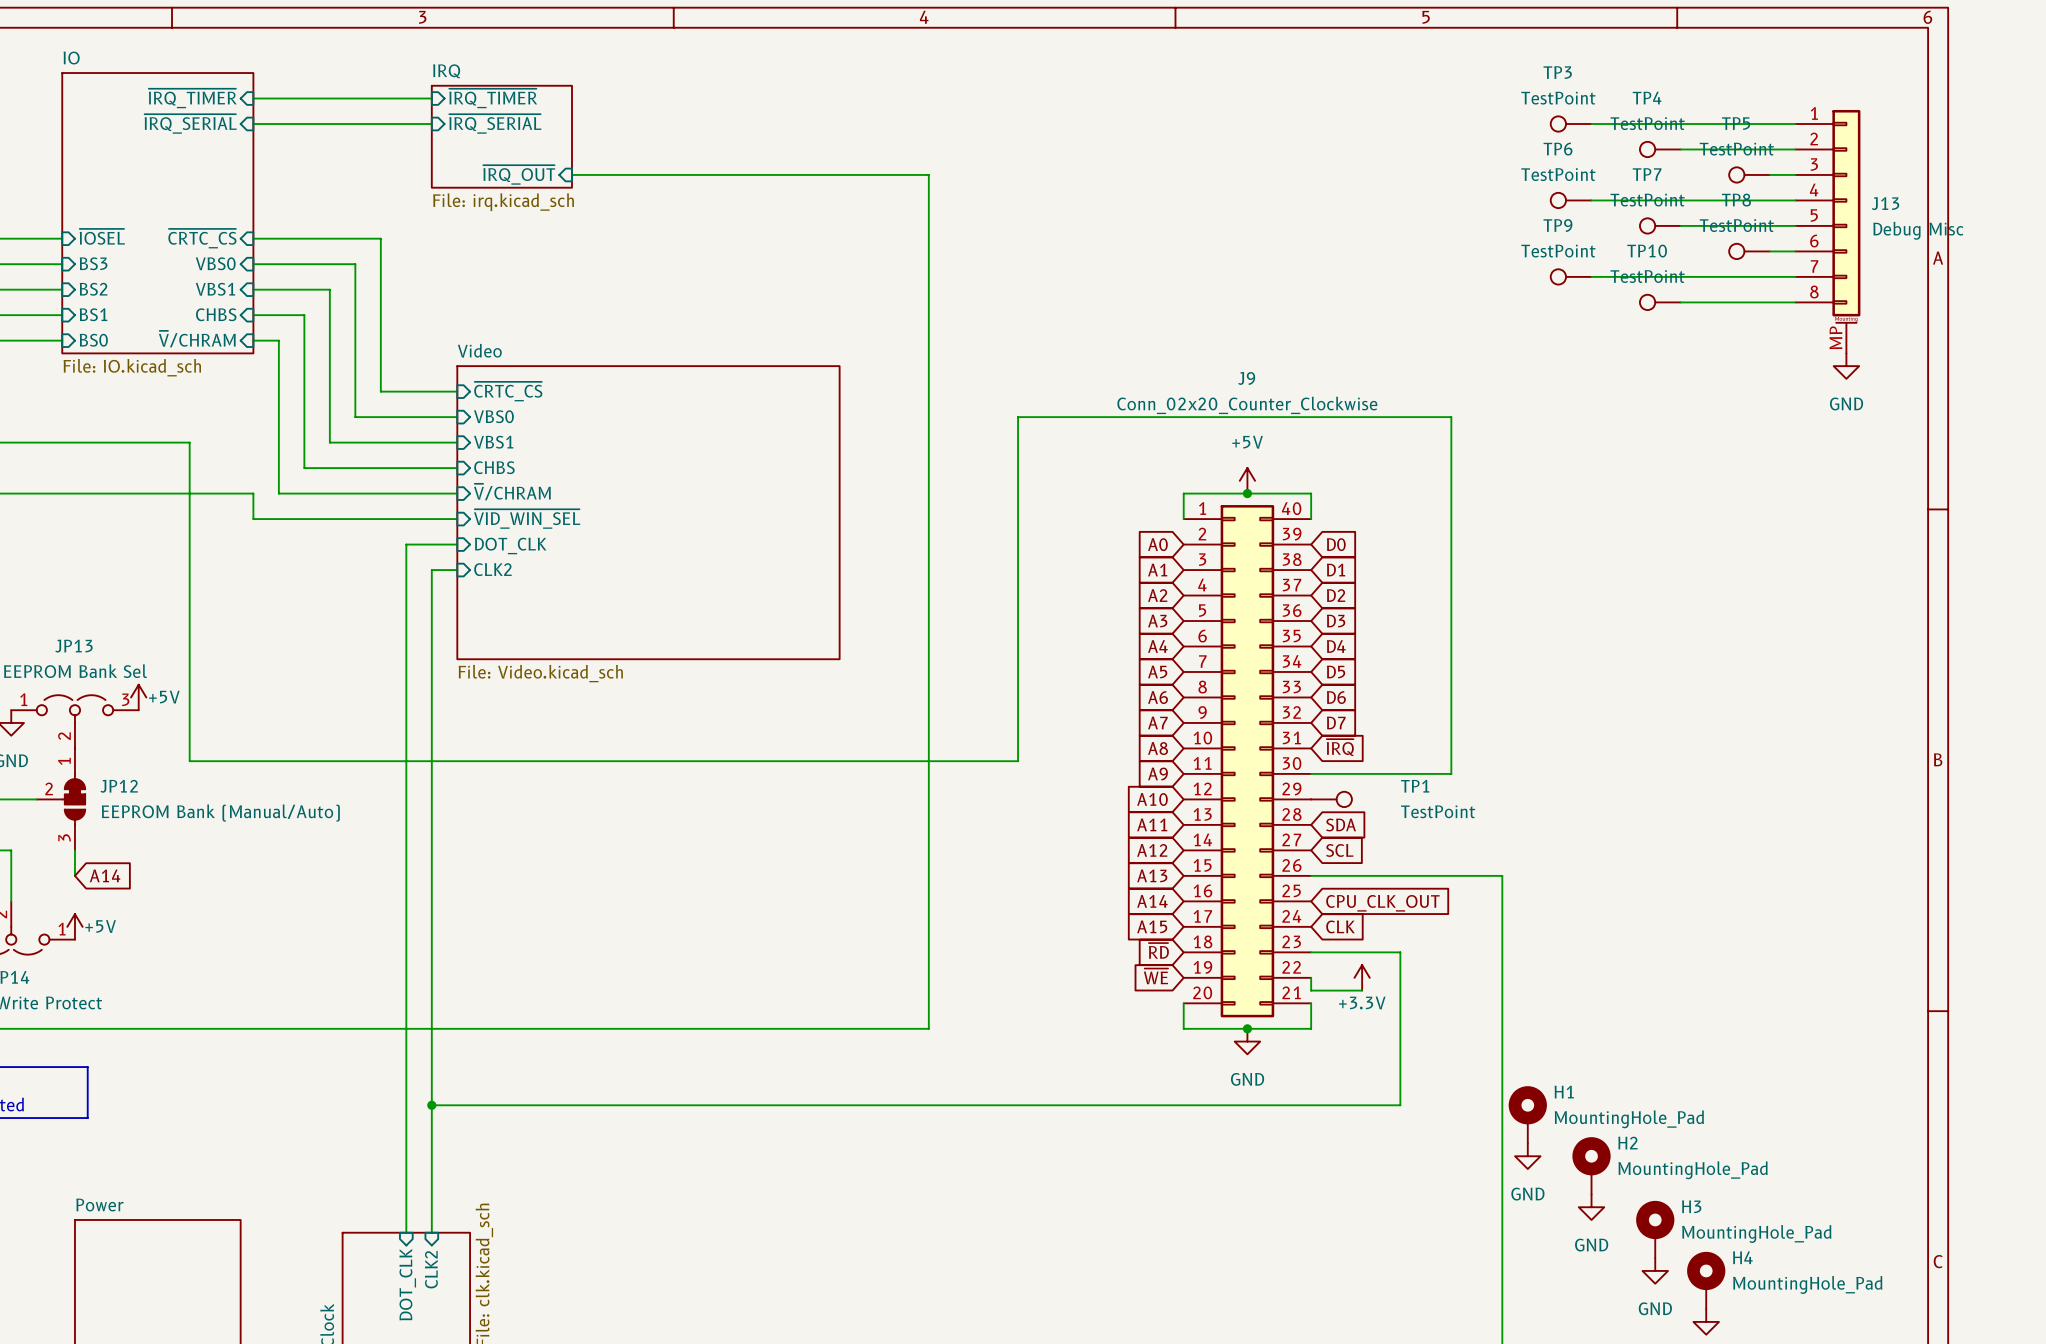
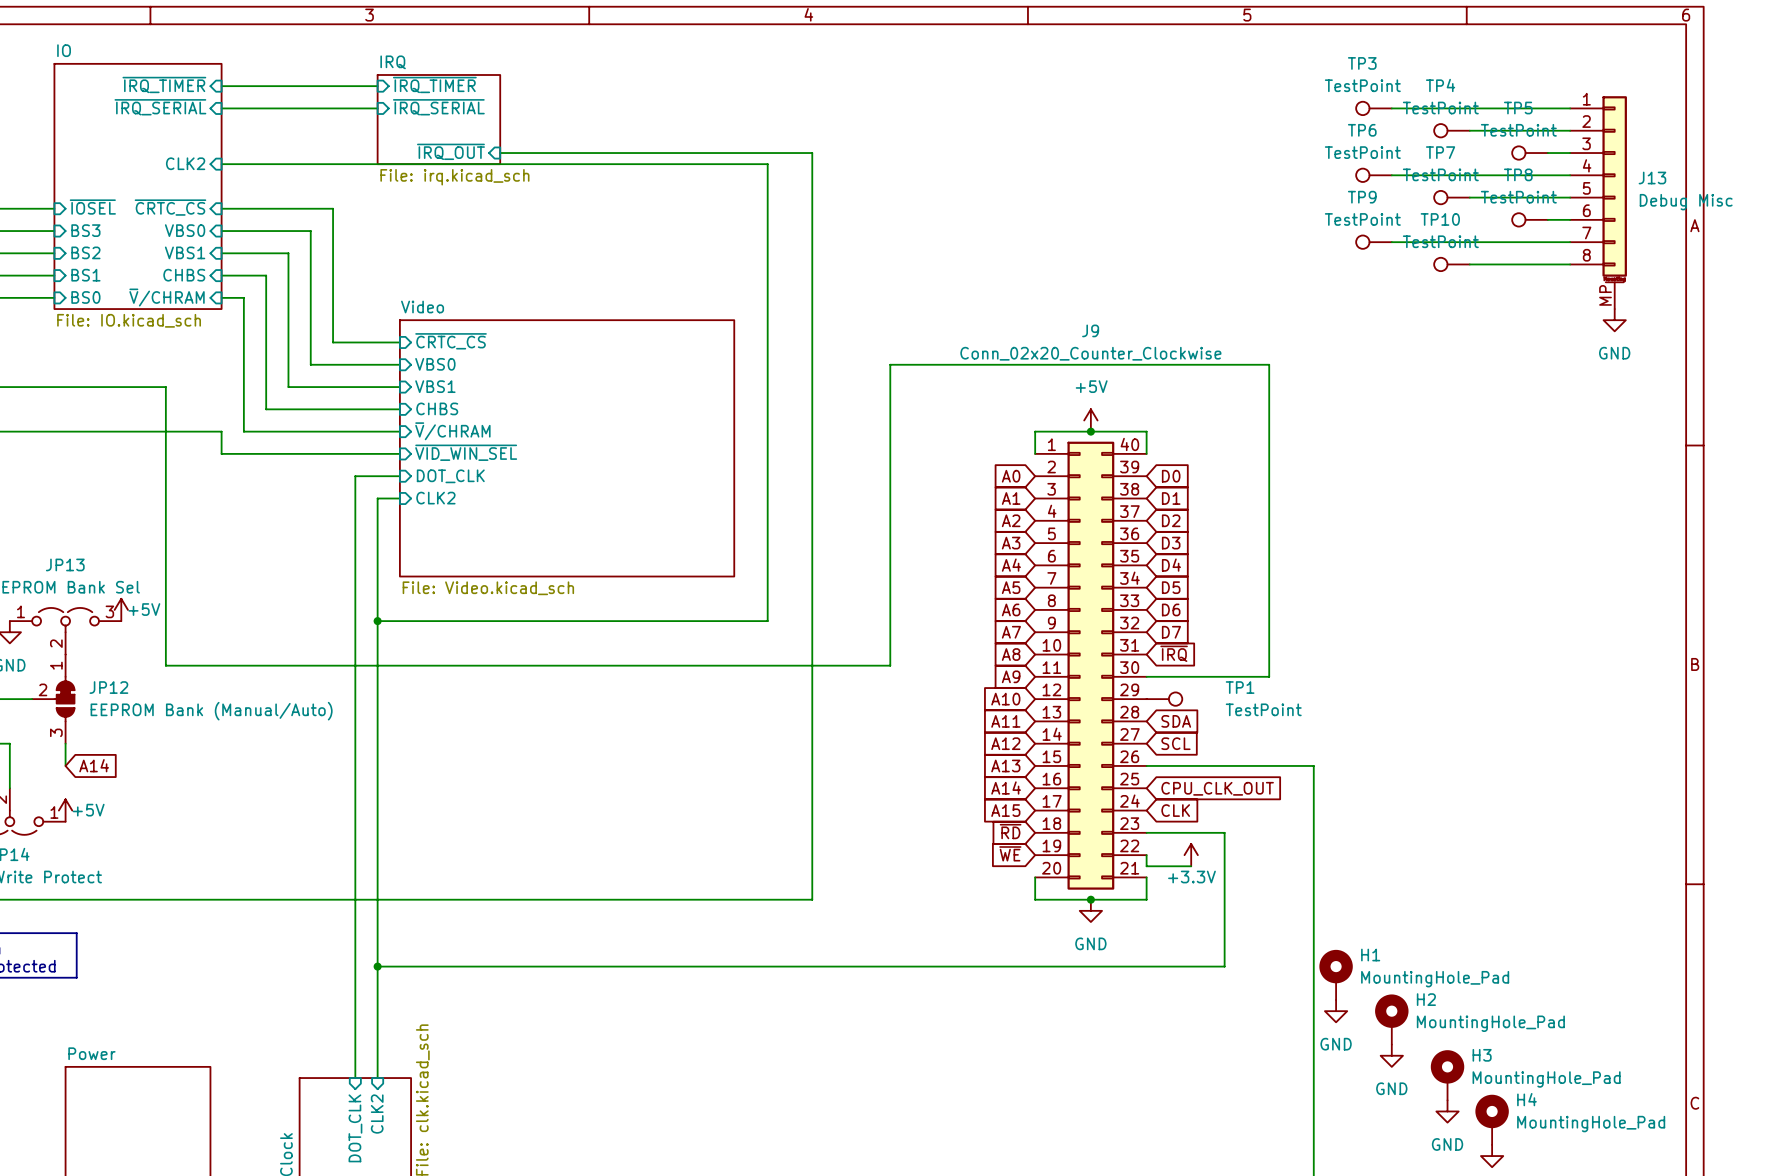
sheet pin: none -> CLK2 (185, 163)
wire: none -> (221, 164) (767, 164) (767, 621) (377, 621)
junction: none -> (377, 621)

